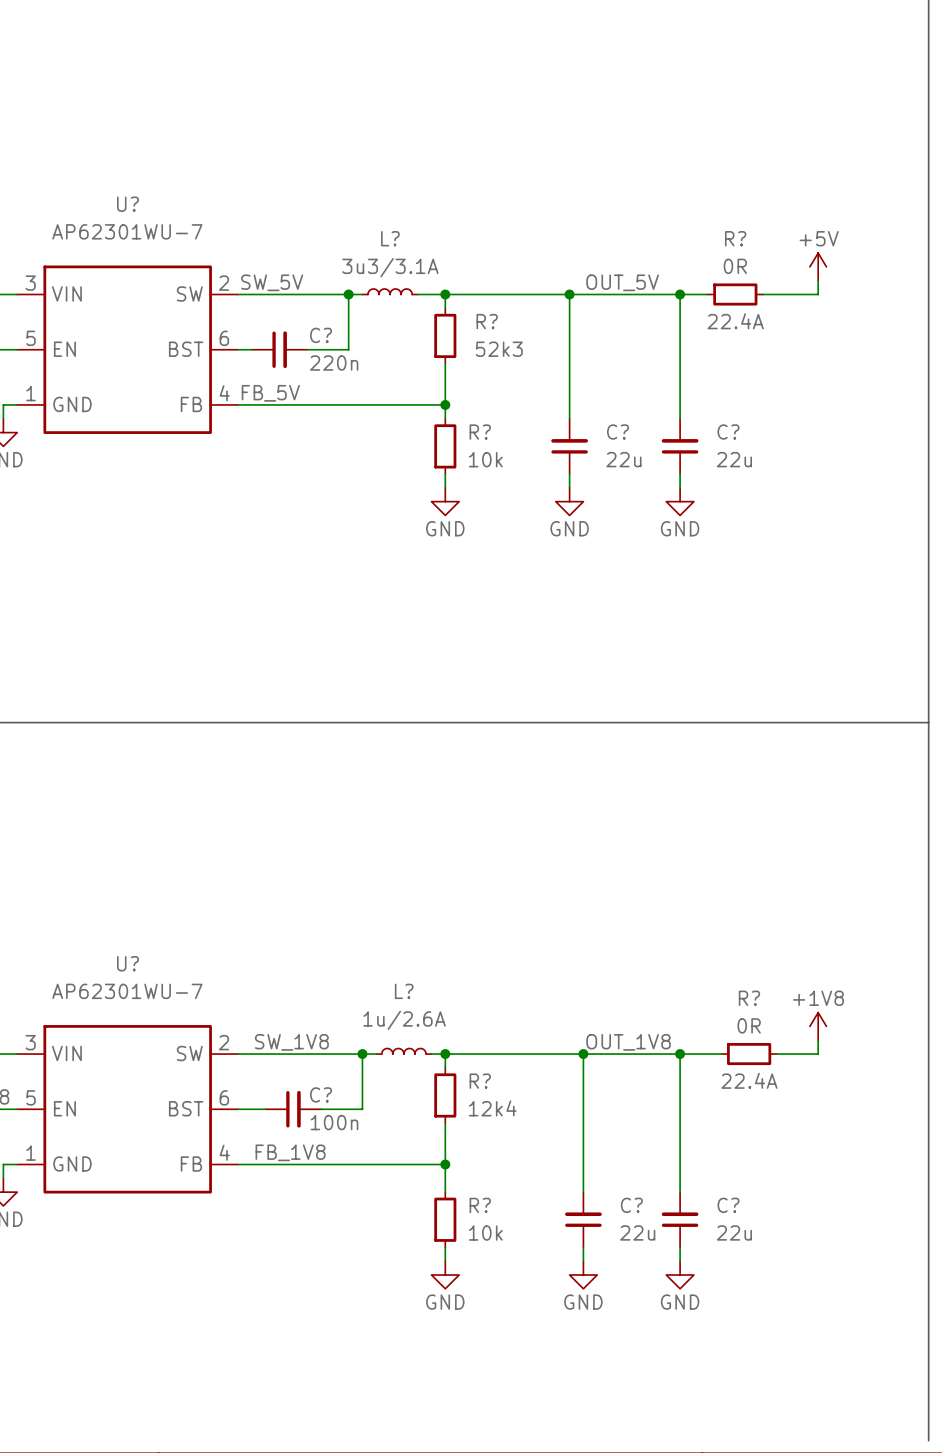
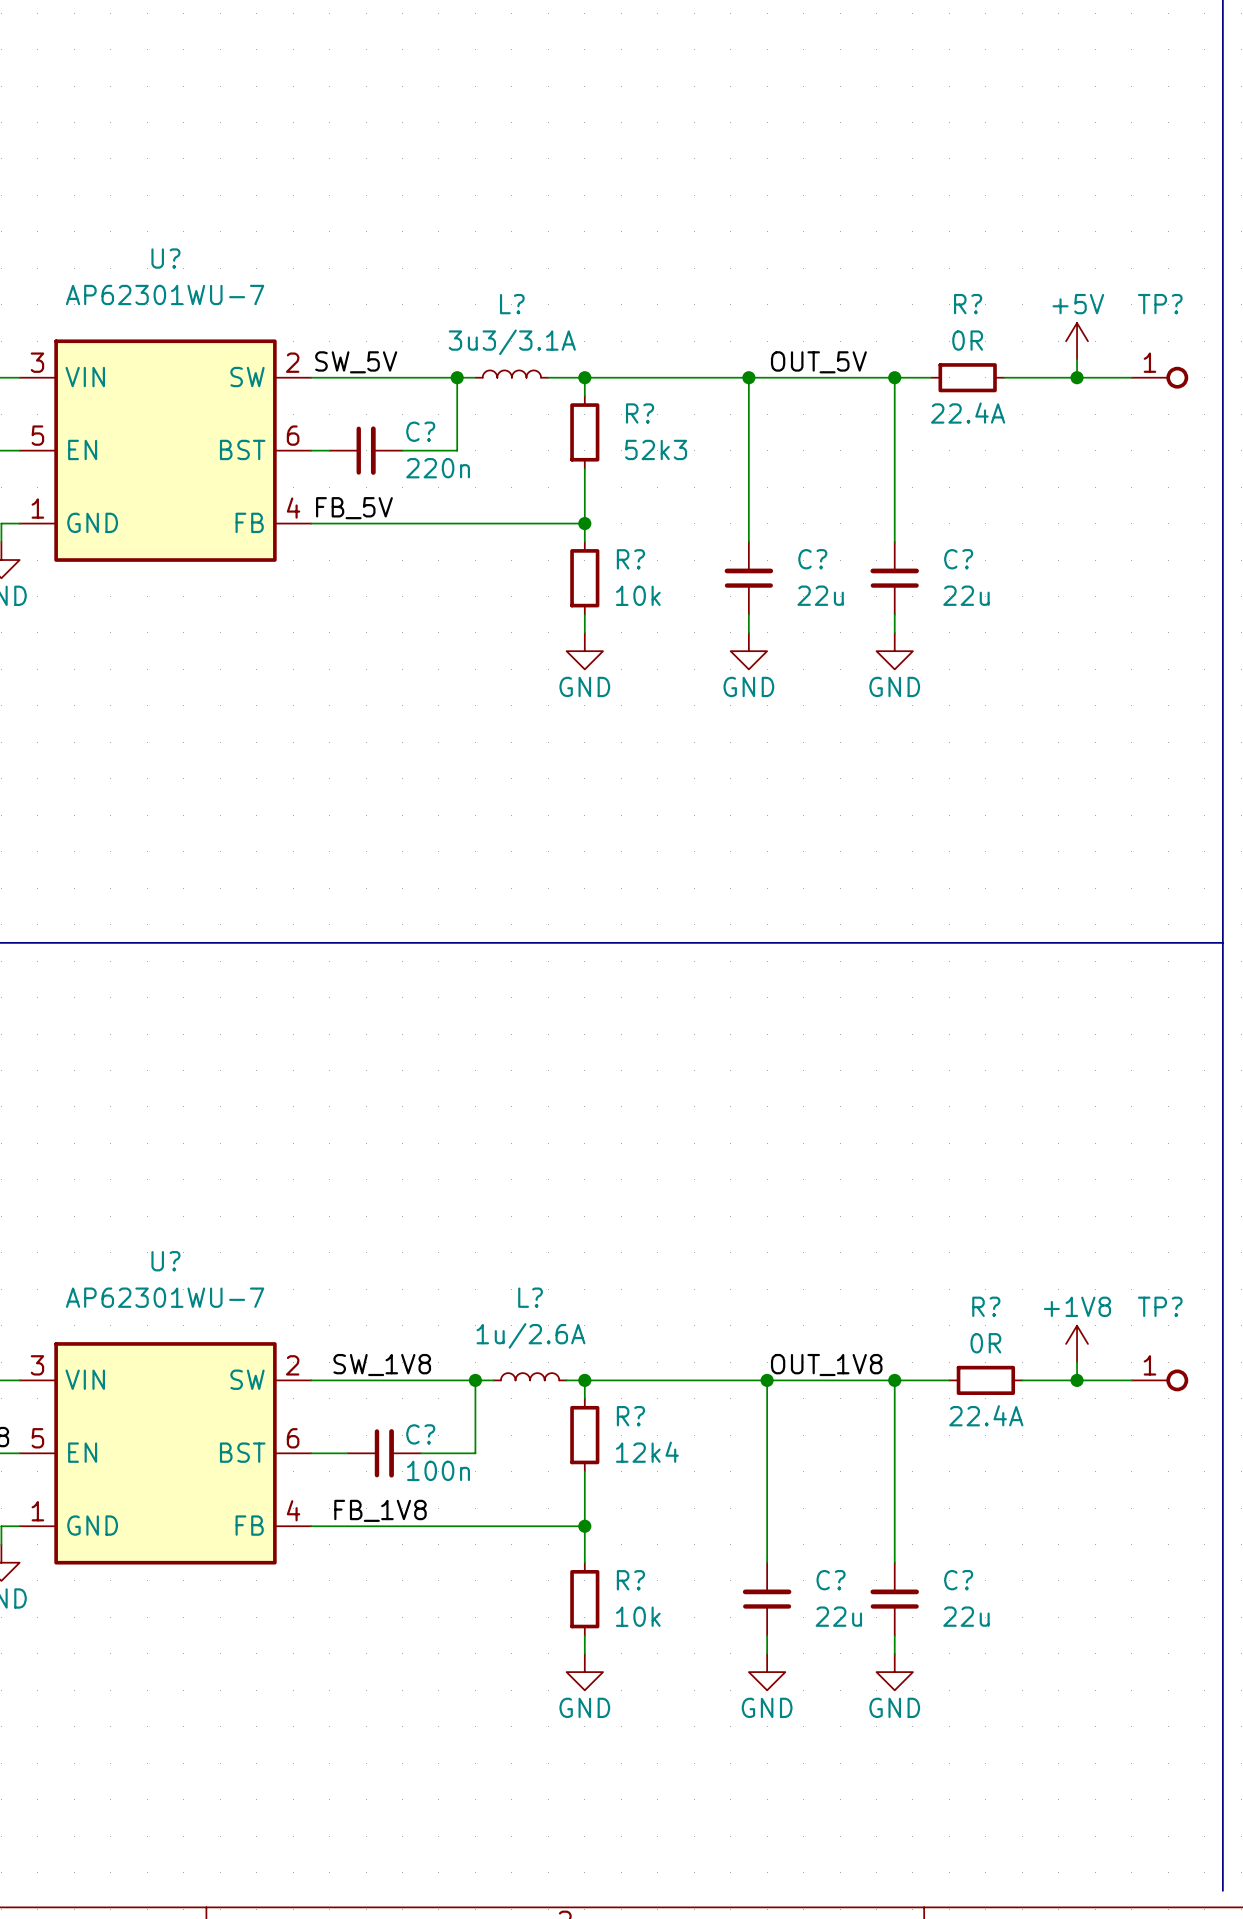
wire: none -> (1077, 377) (1131, 377)
junction: none -> (1077, 377)
TP?: none -> (1159, 377)
wire: none -> (1077, 1380) (1131, 1380)
junction: none -> (1077, 1380)
TP?: none -> (1159, 1380)

